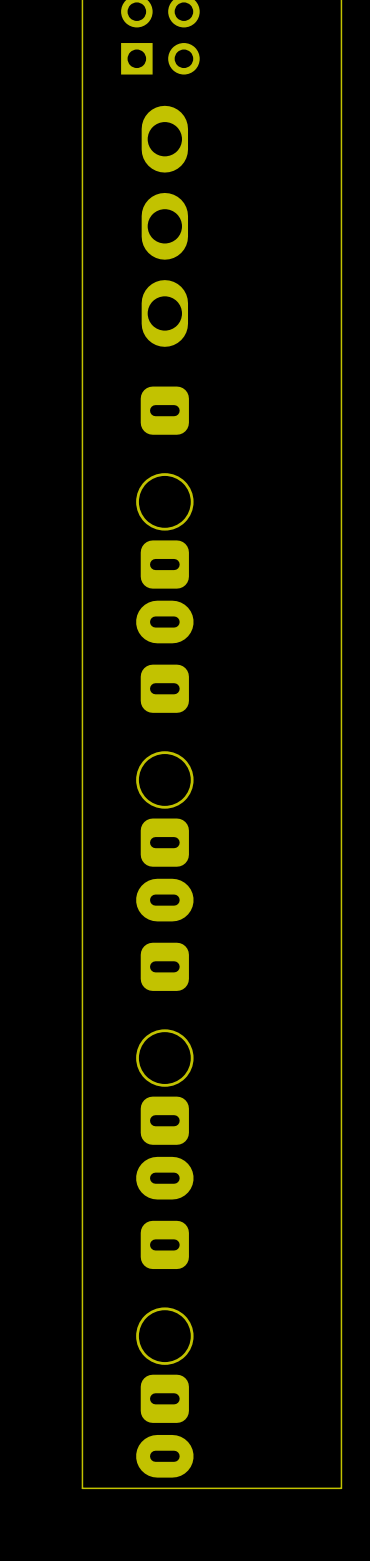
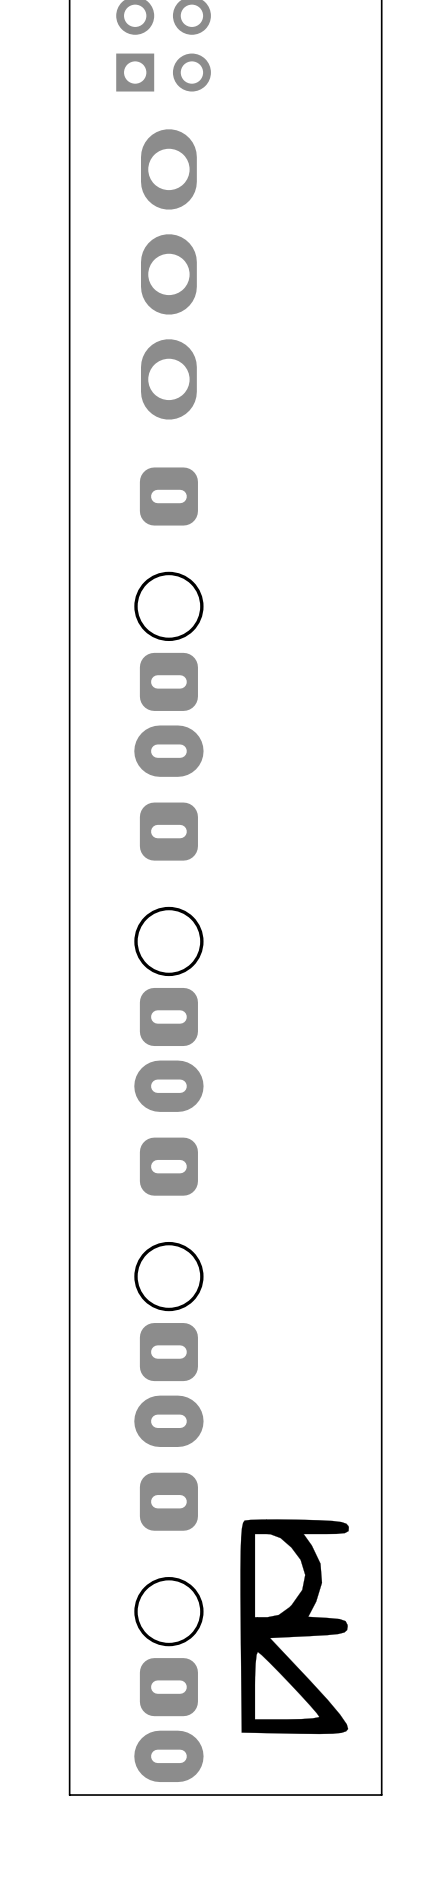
drawing: none -> [240, 1519, 349, 1735]

